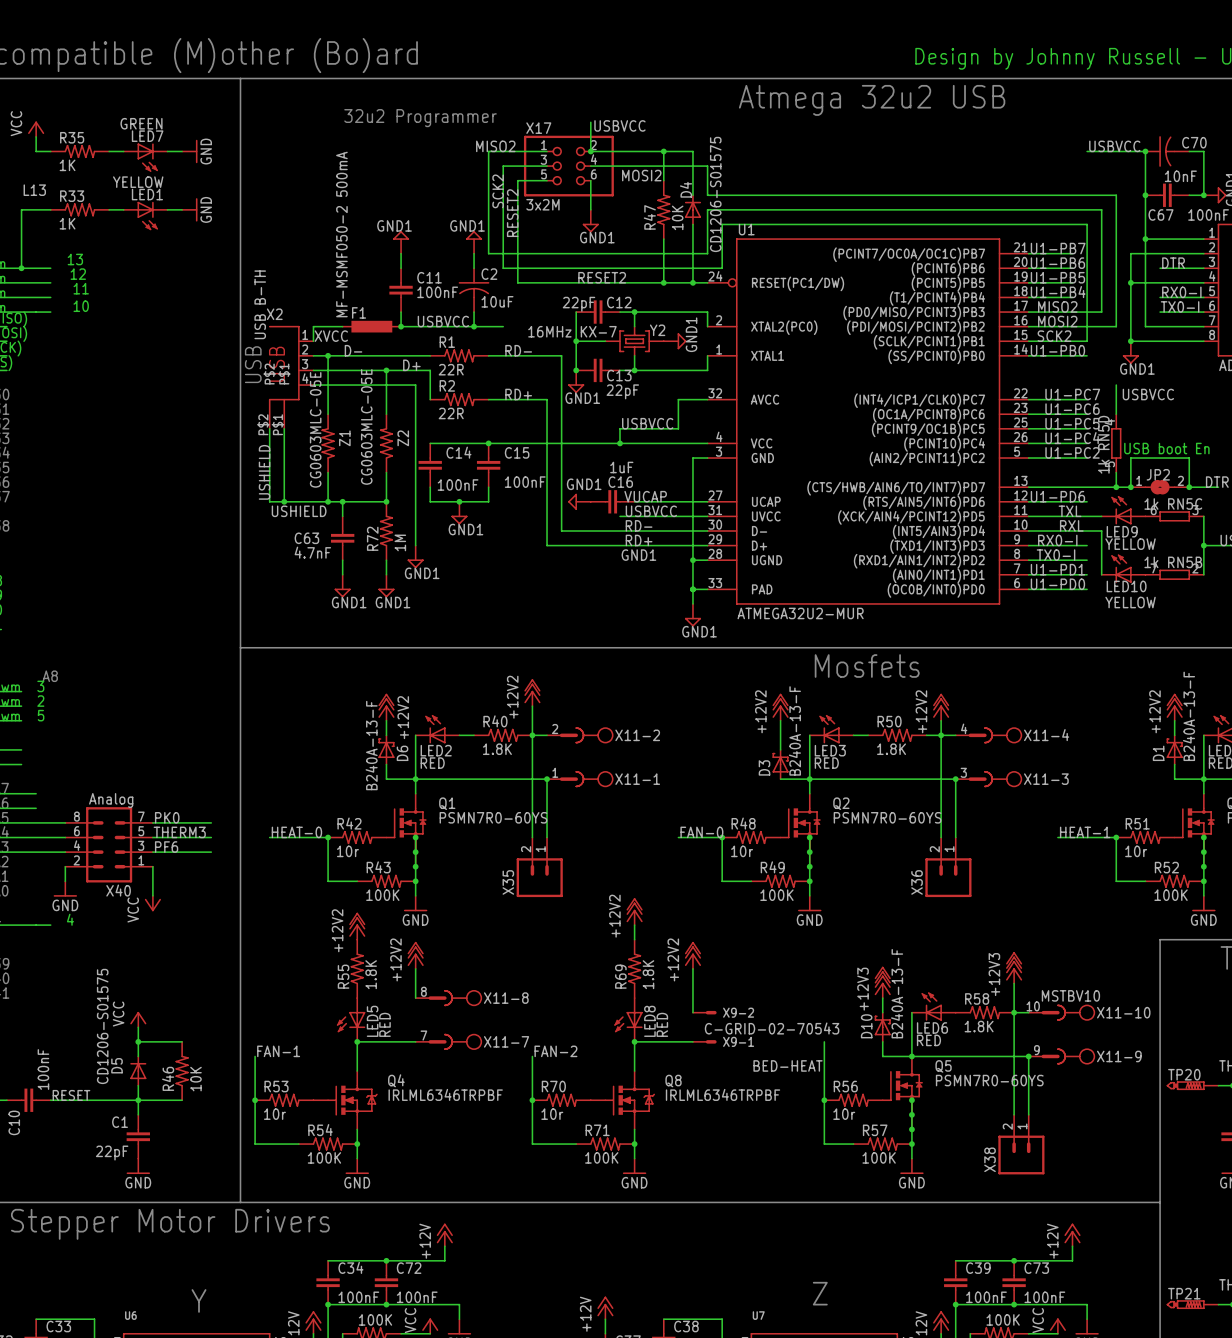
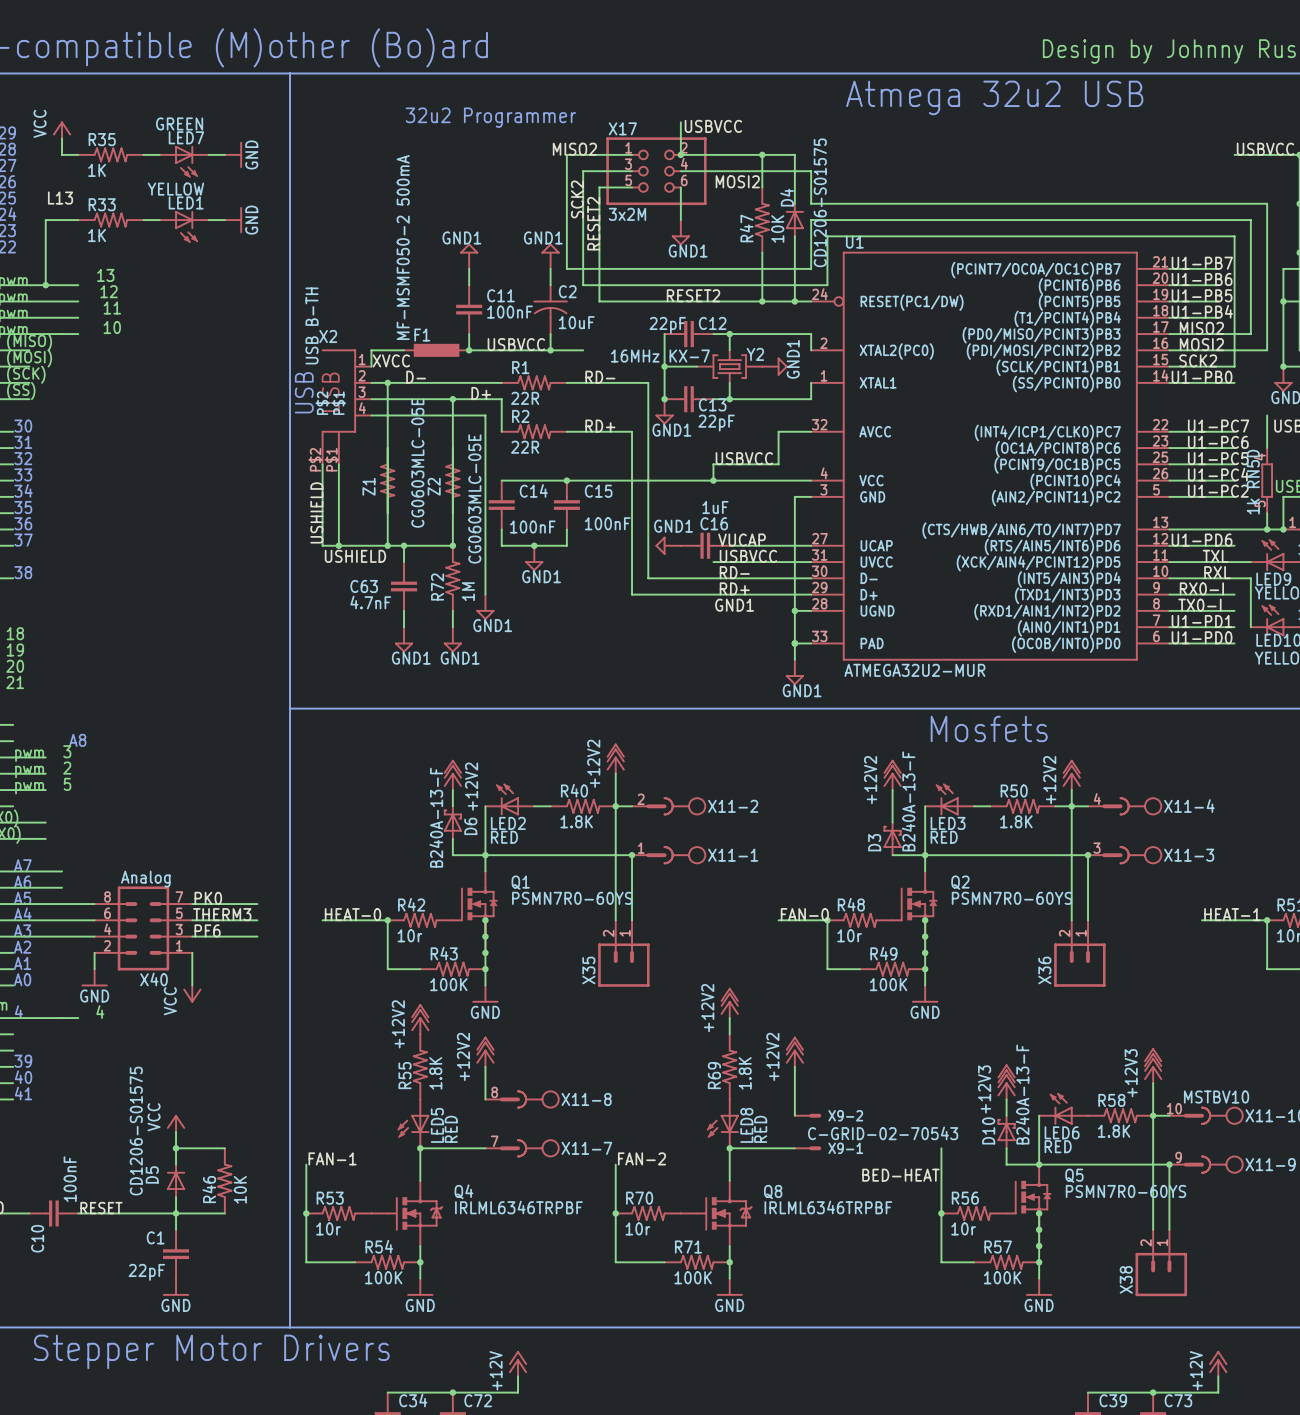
Z1 value position: CG0603MLC-05E (315, 429) -> CG0603MLC-05E (417, 463)
Z1 rotation: 0° (328, 443) -> 180° (387, 480)
Z2 rotation: 0° (386, 443) -> 180° (452, 480)

